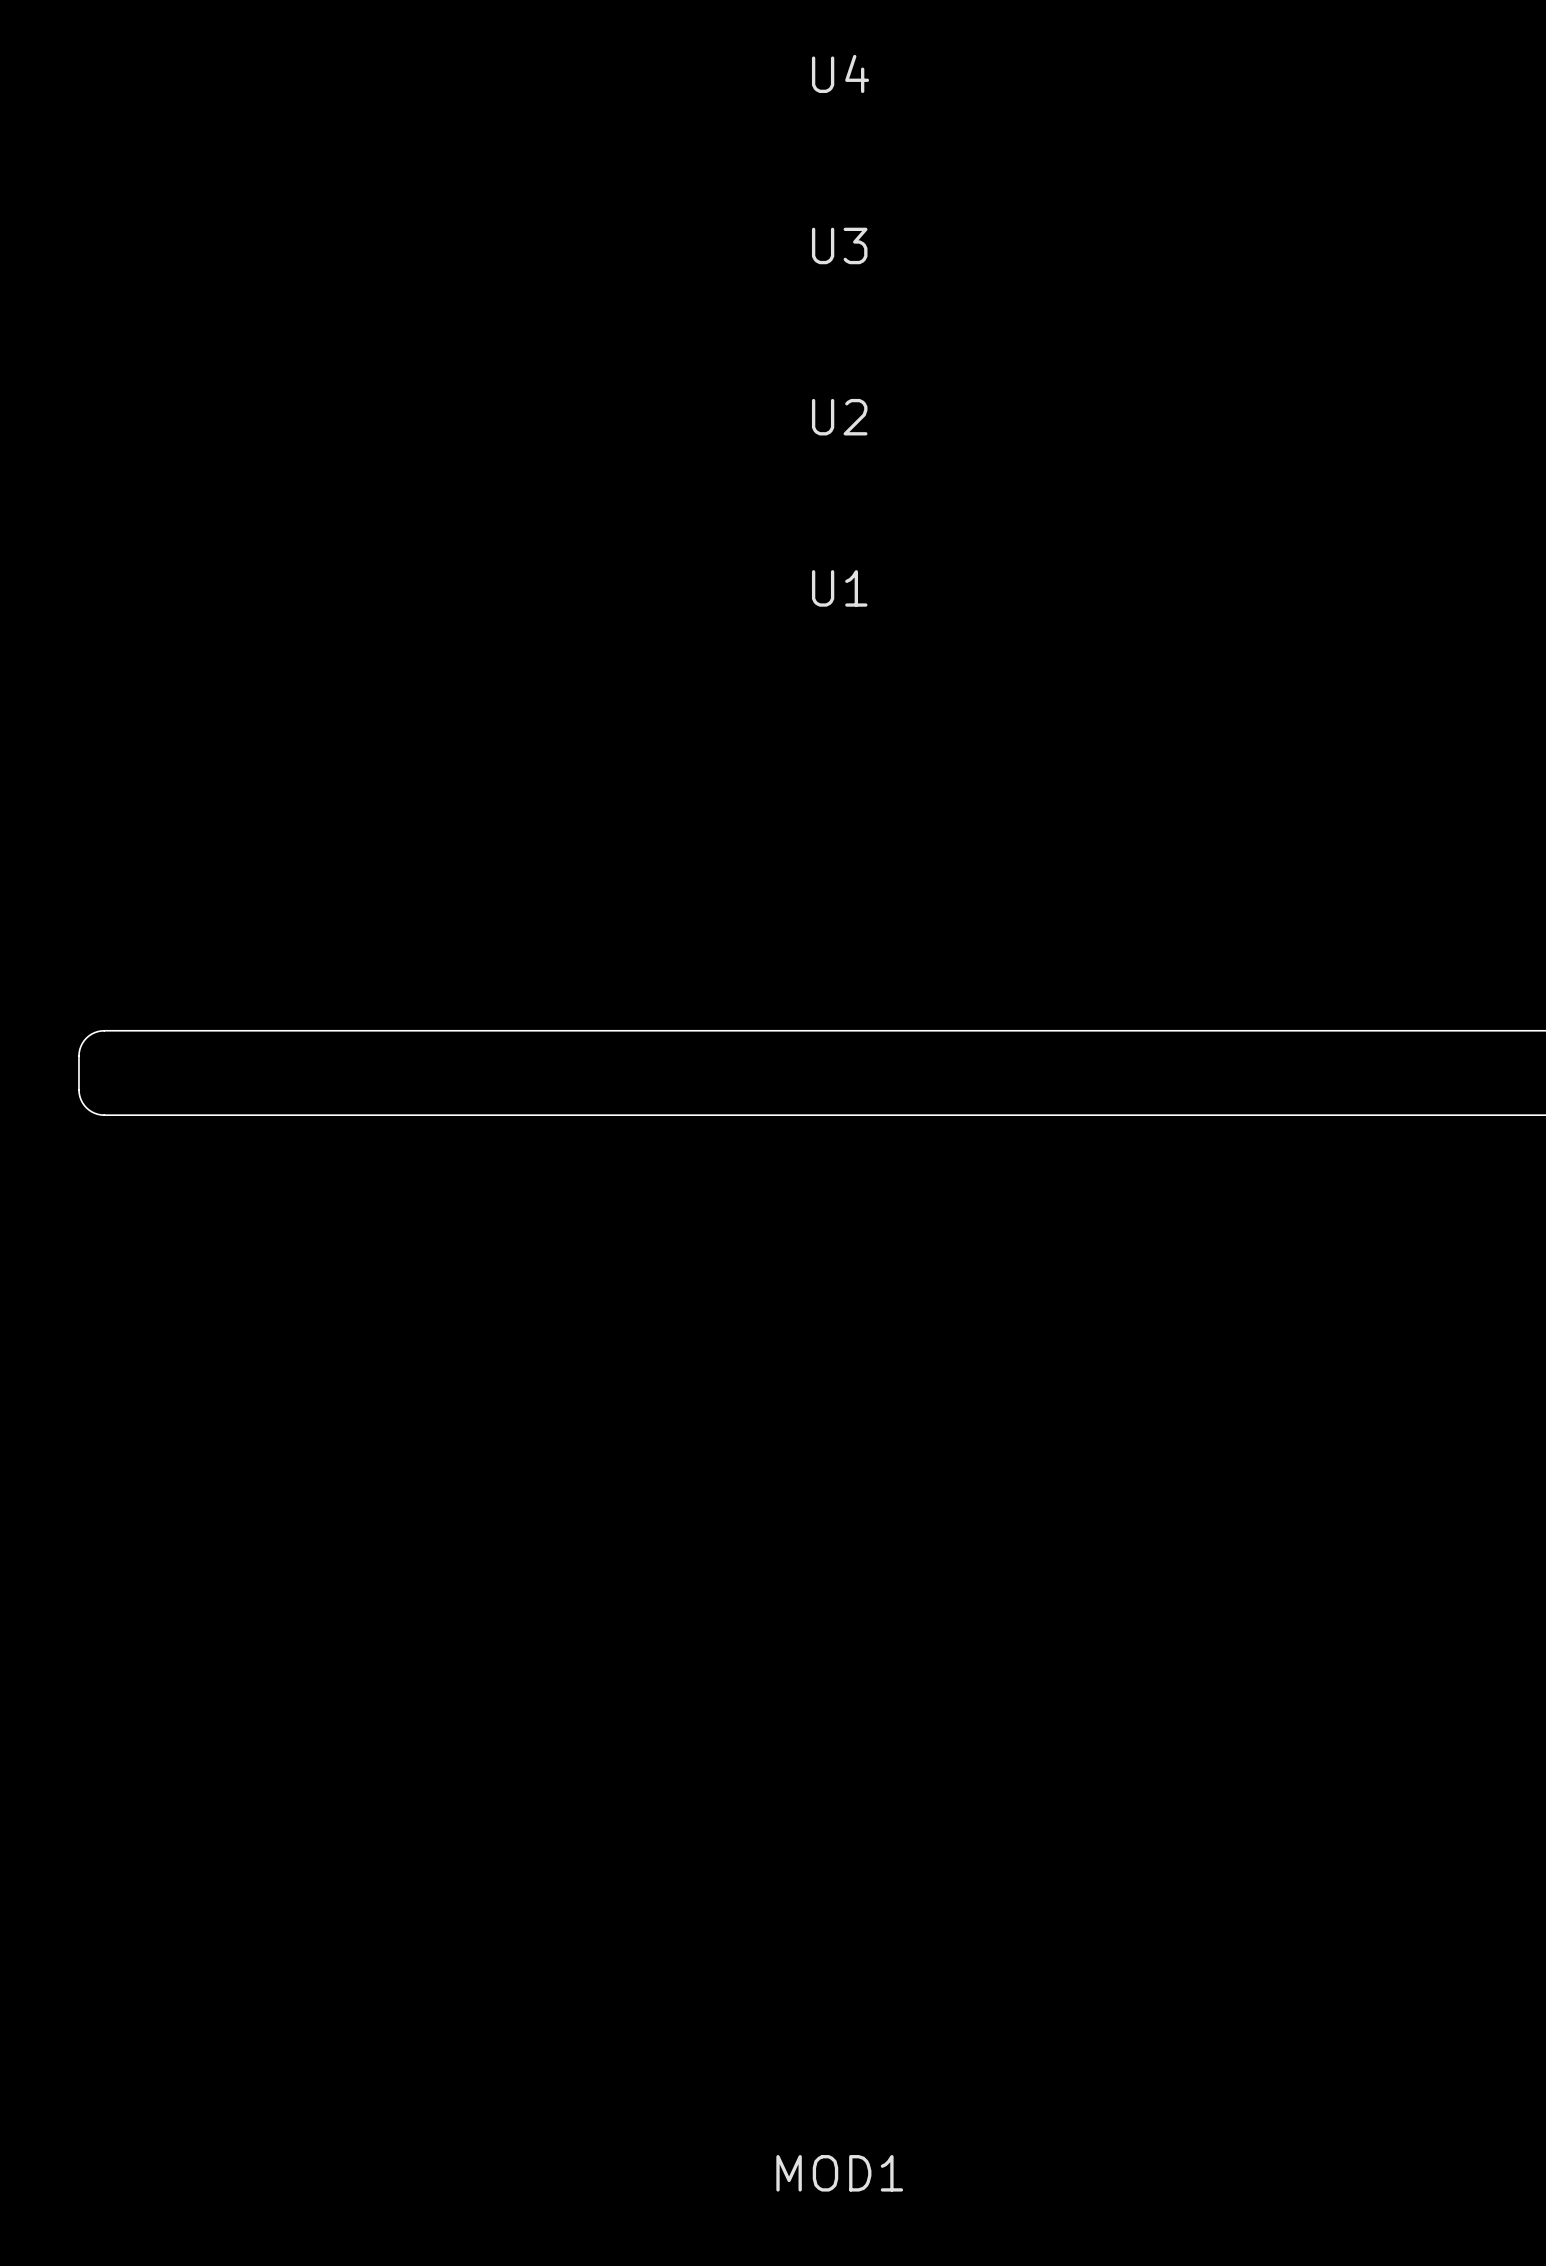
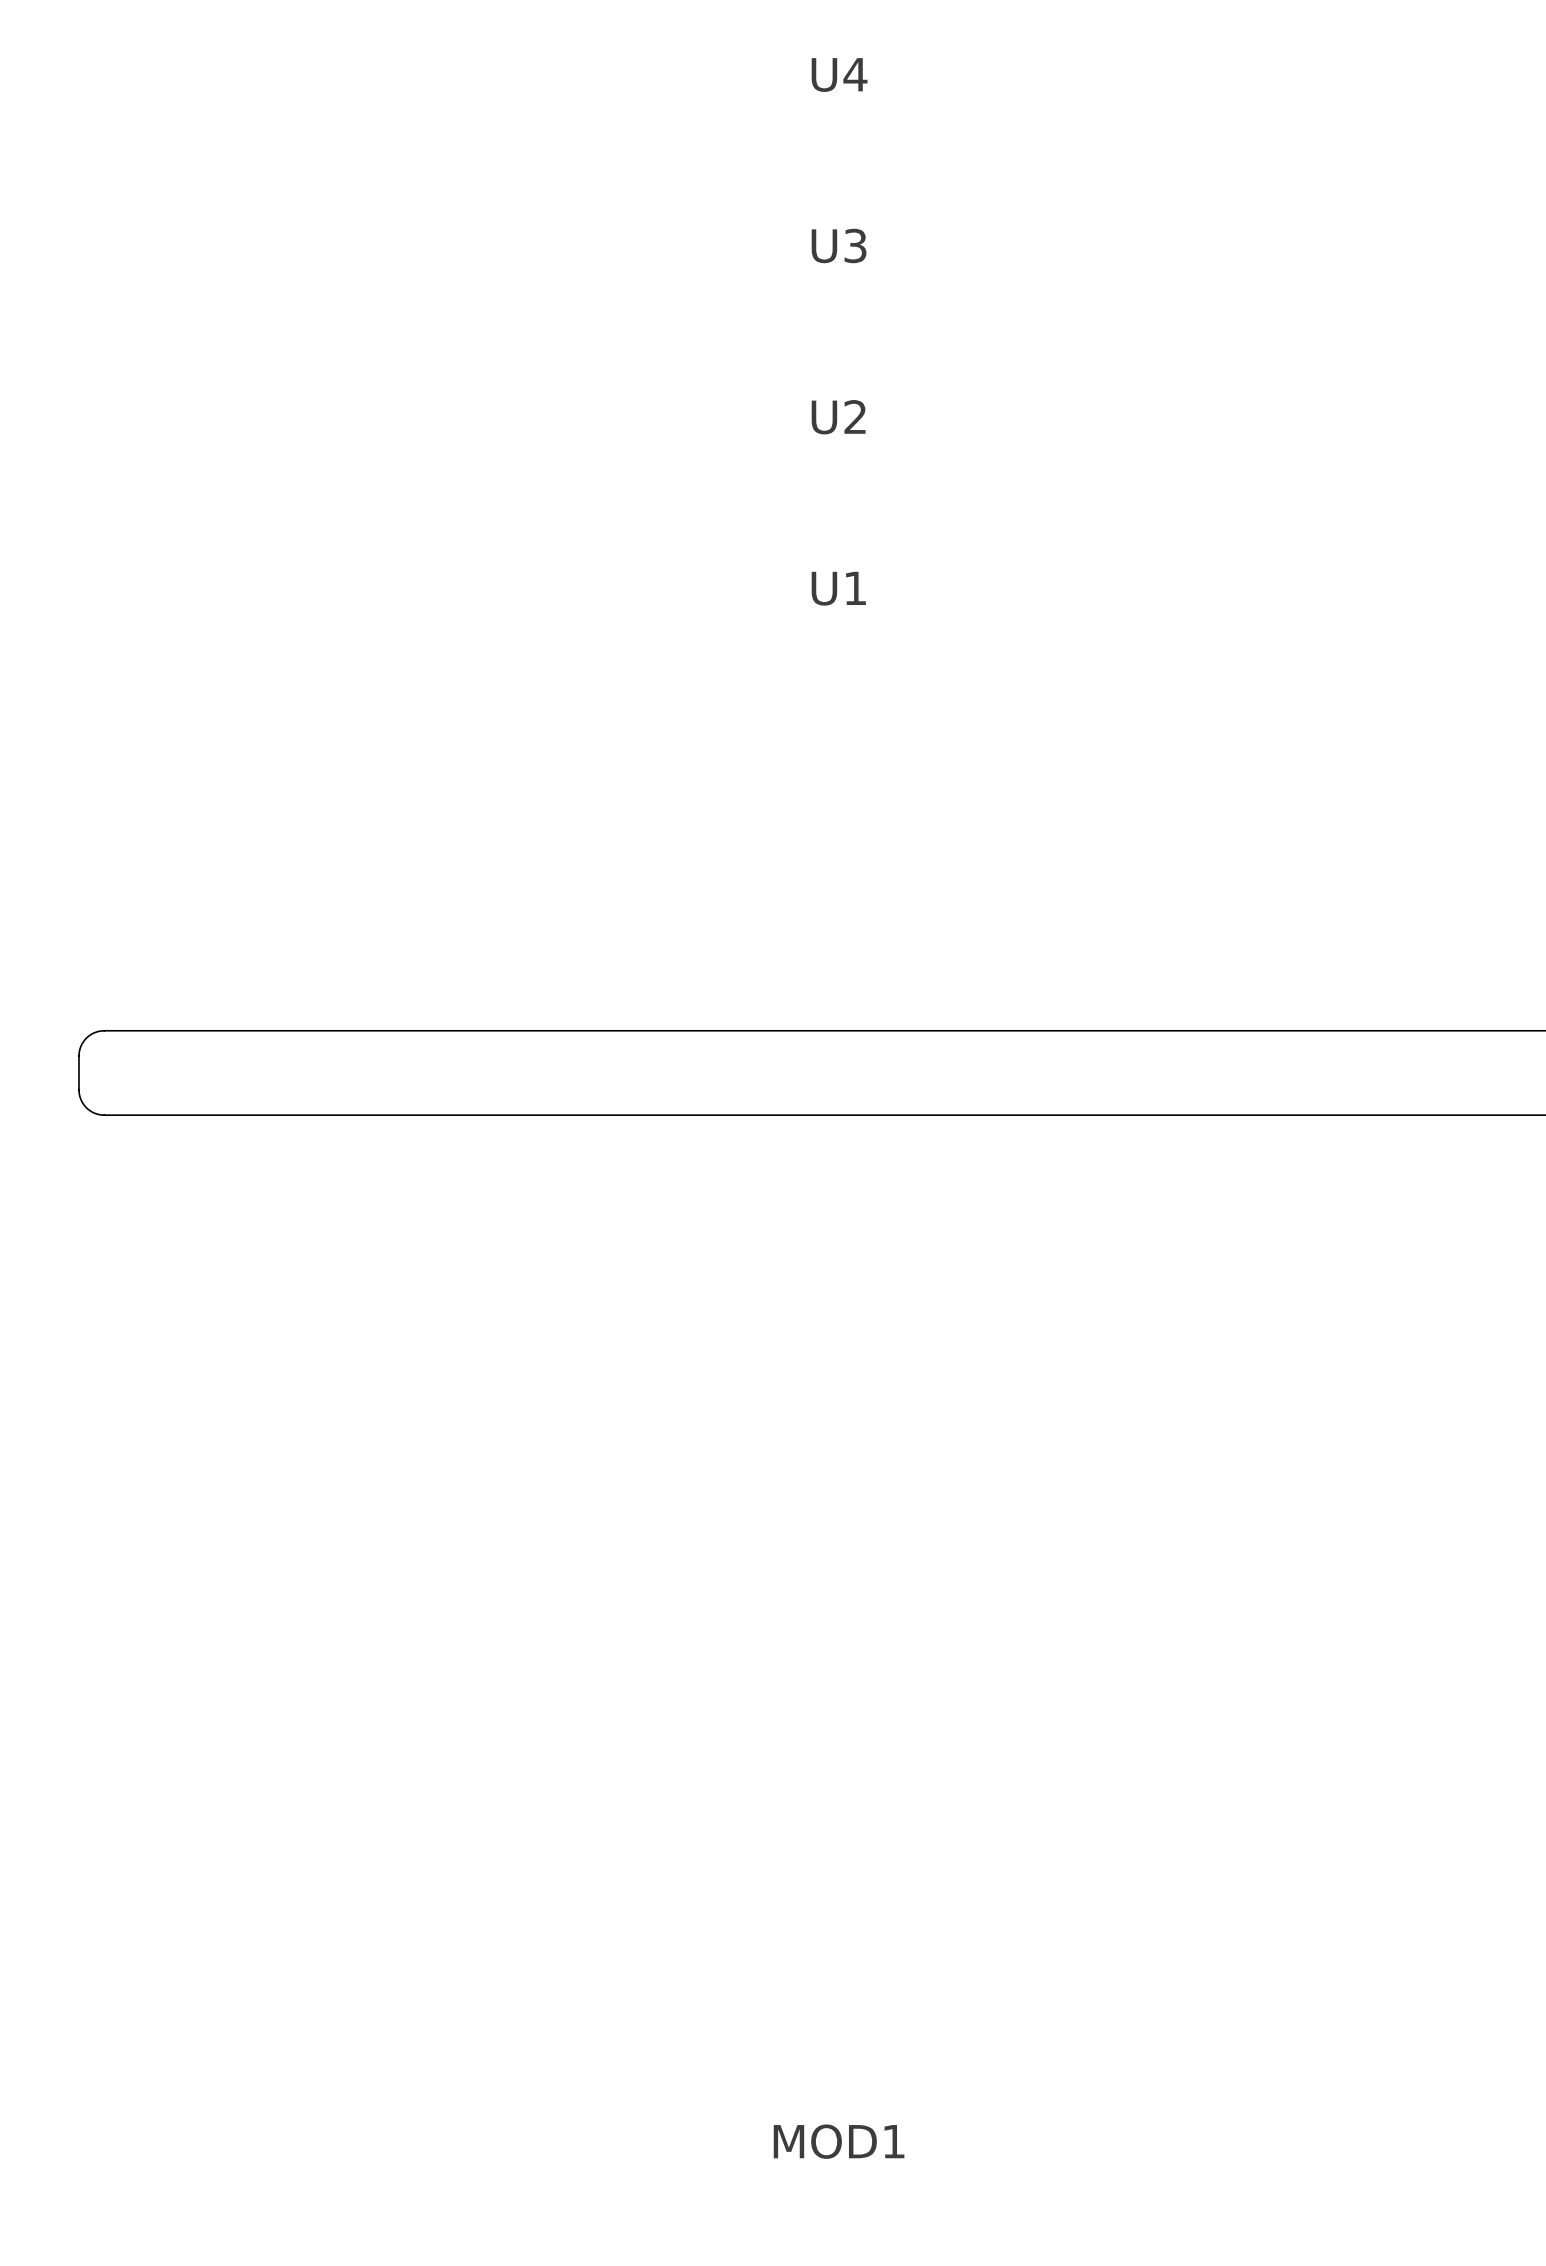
MOD1 position: (839, 2173) -> (839, 2141)

